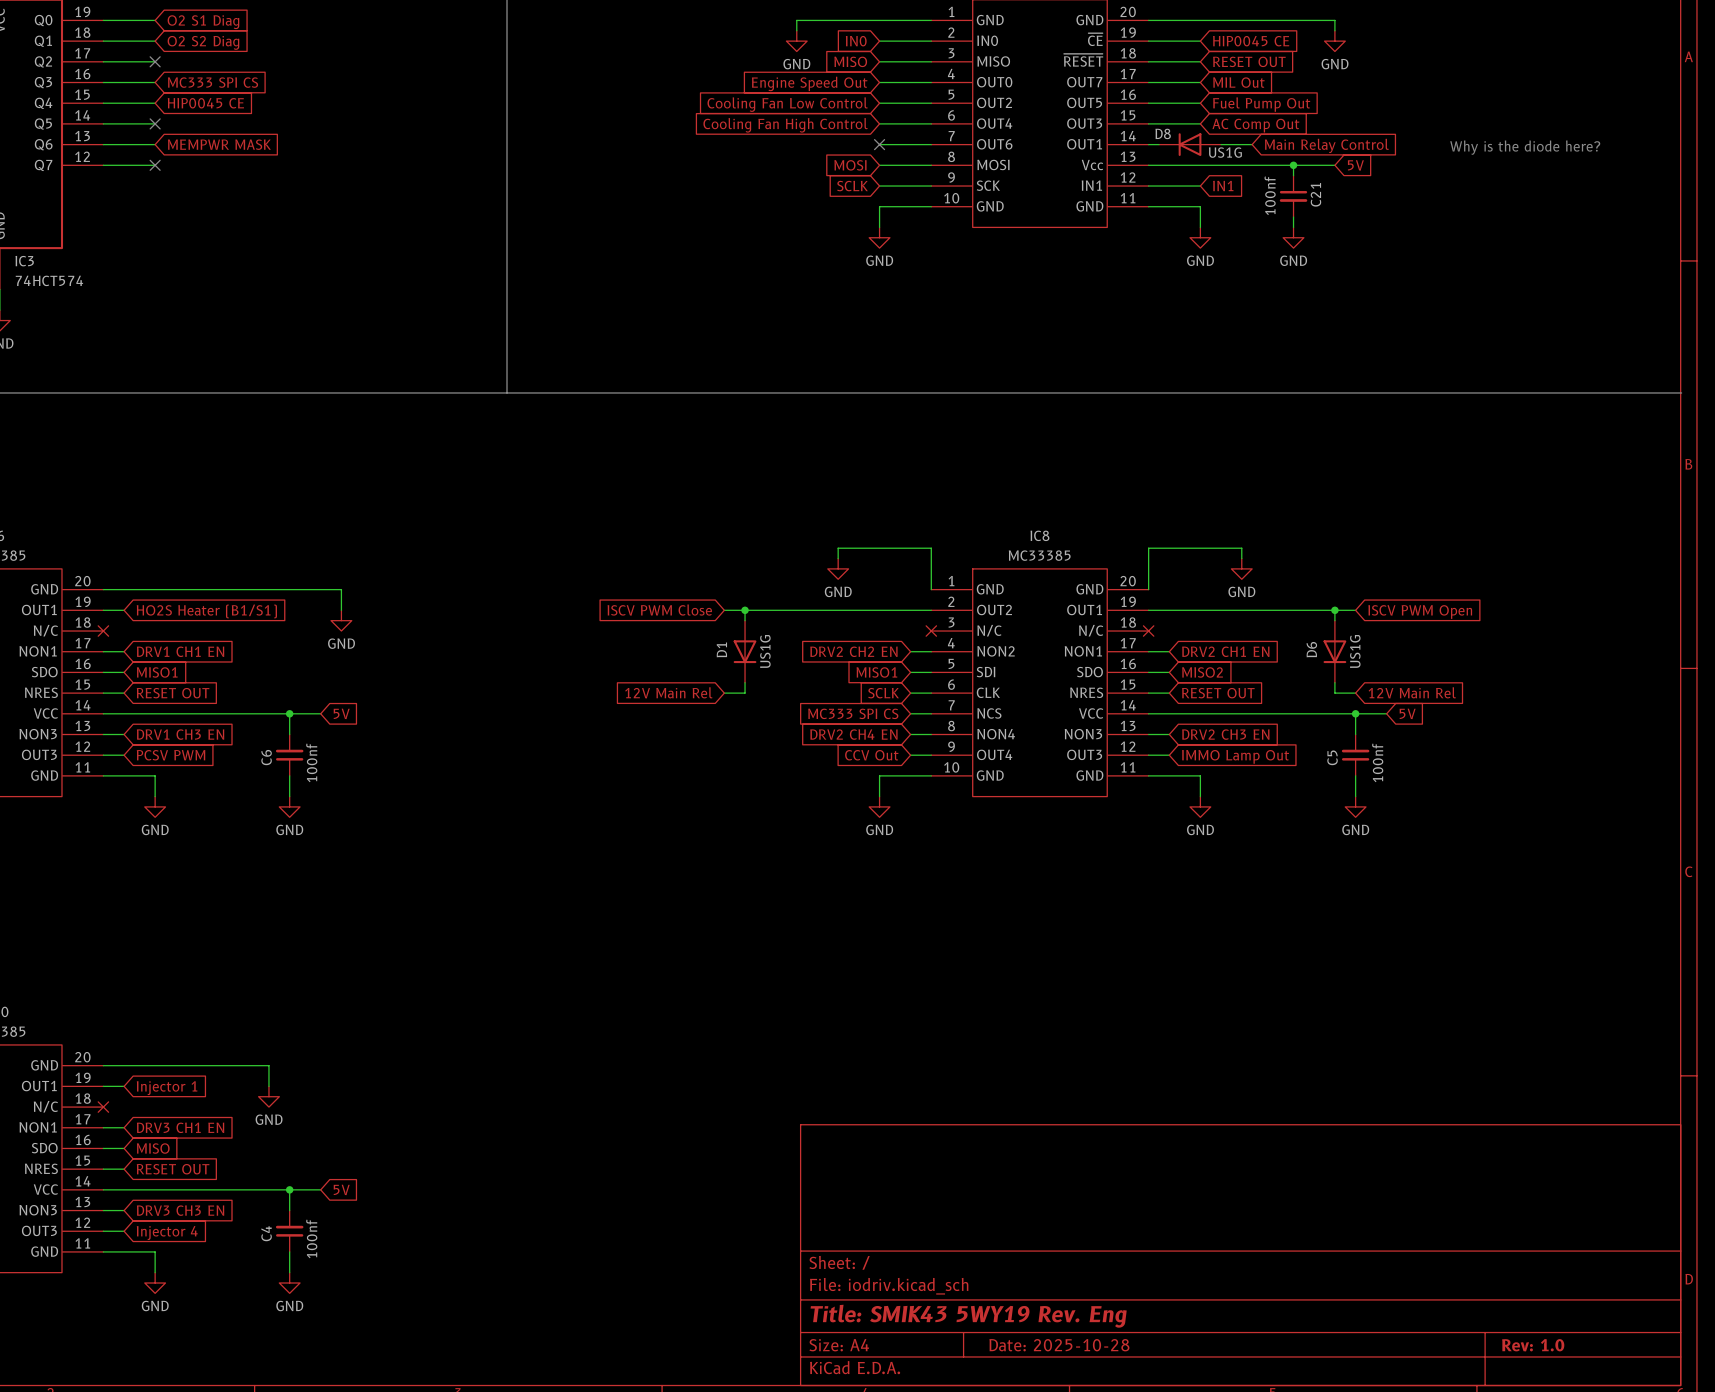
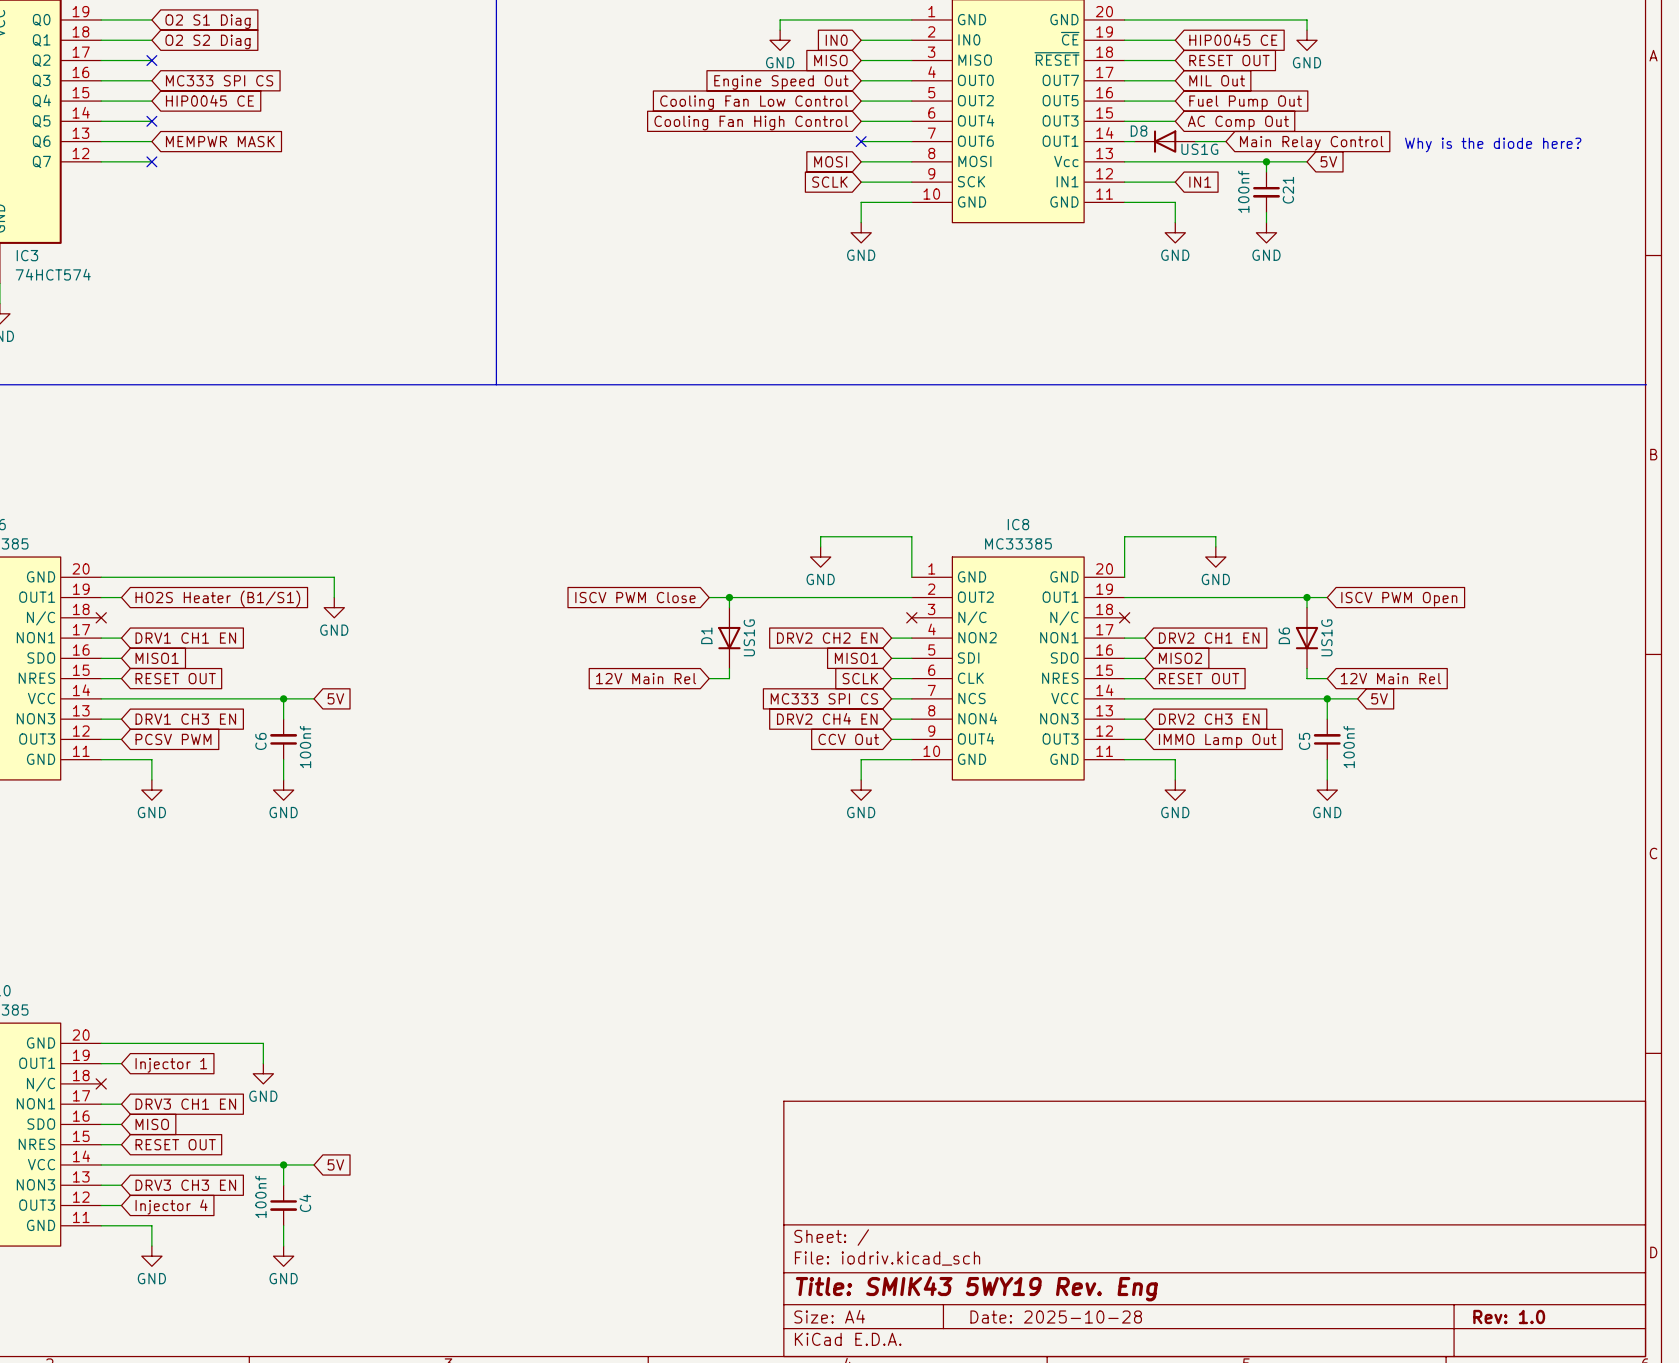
C4 rotation: 0° (289, 1231) -> 180° (283, 1205)

